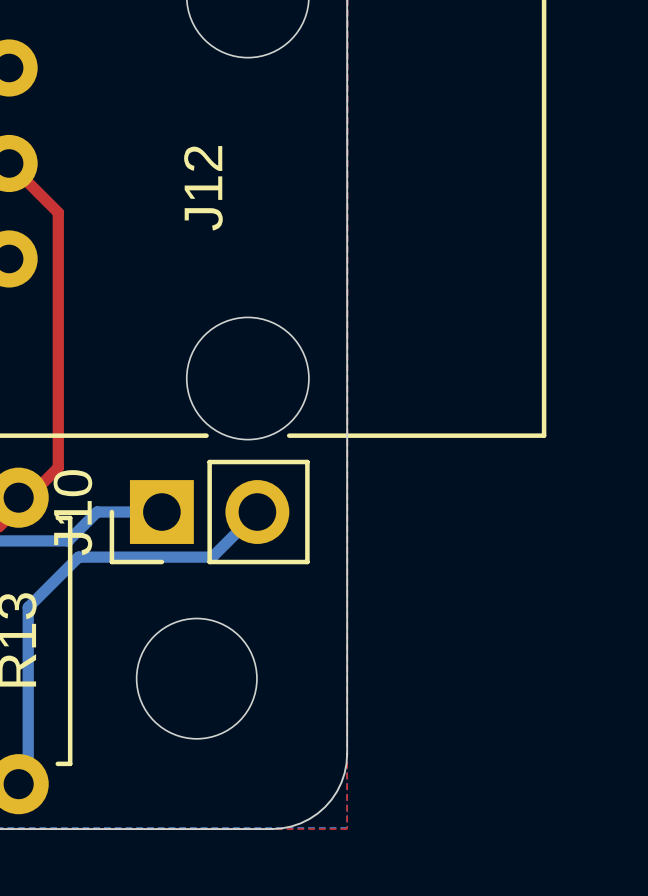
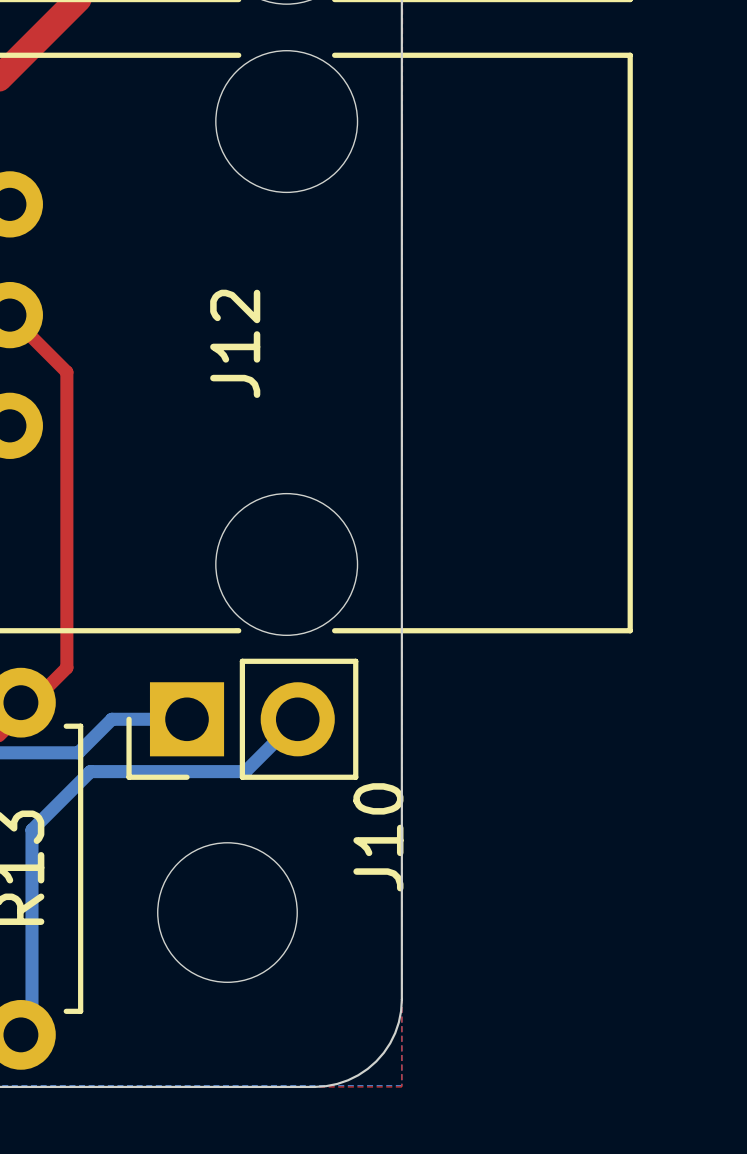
J10 name position: J10 (72, 512) -> J10 (378, 837)

